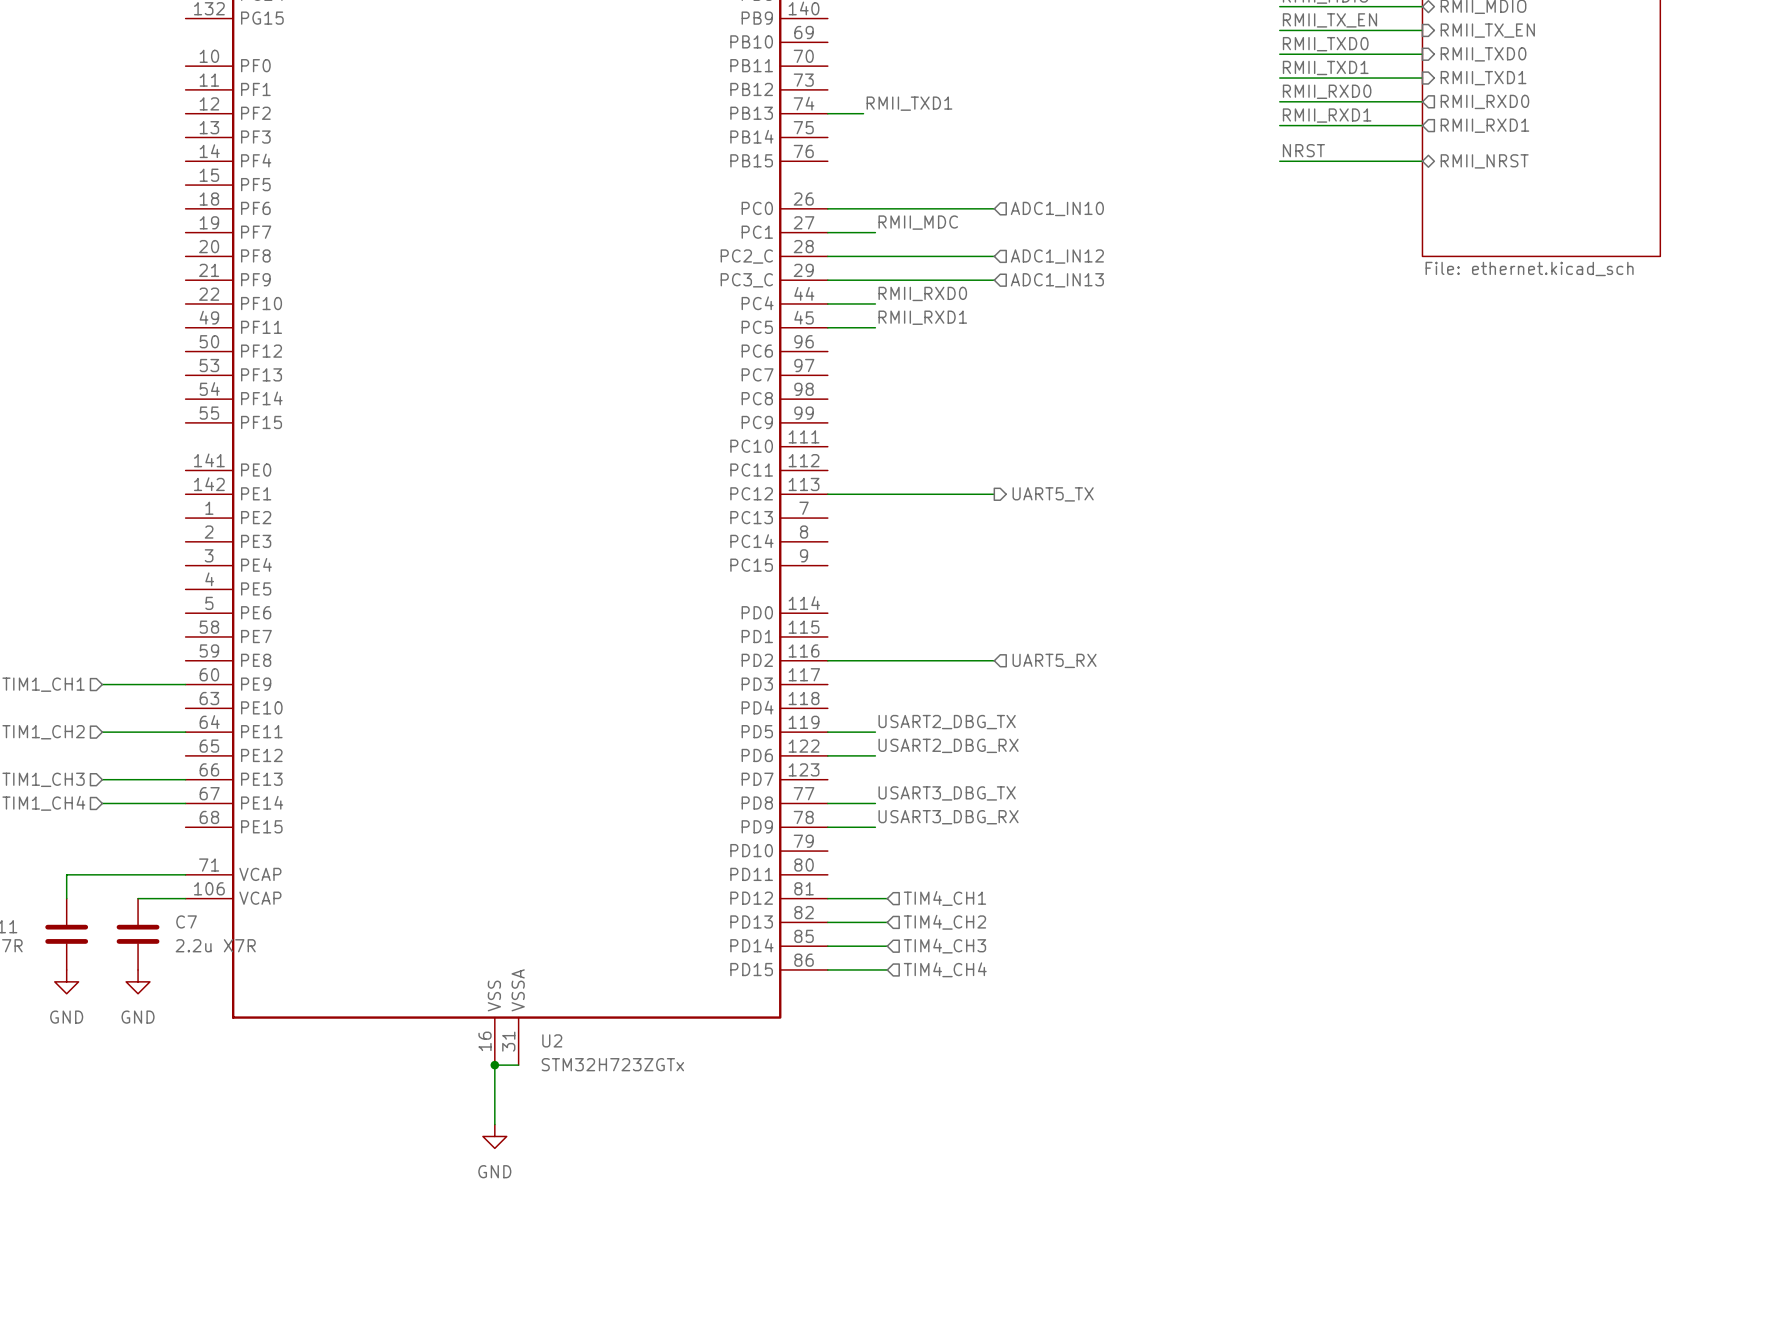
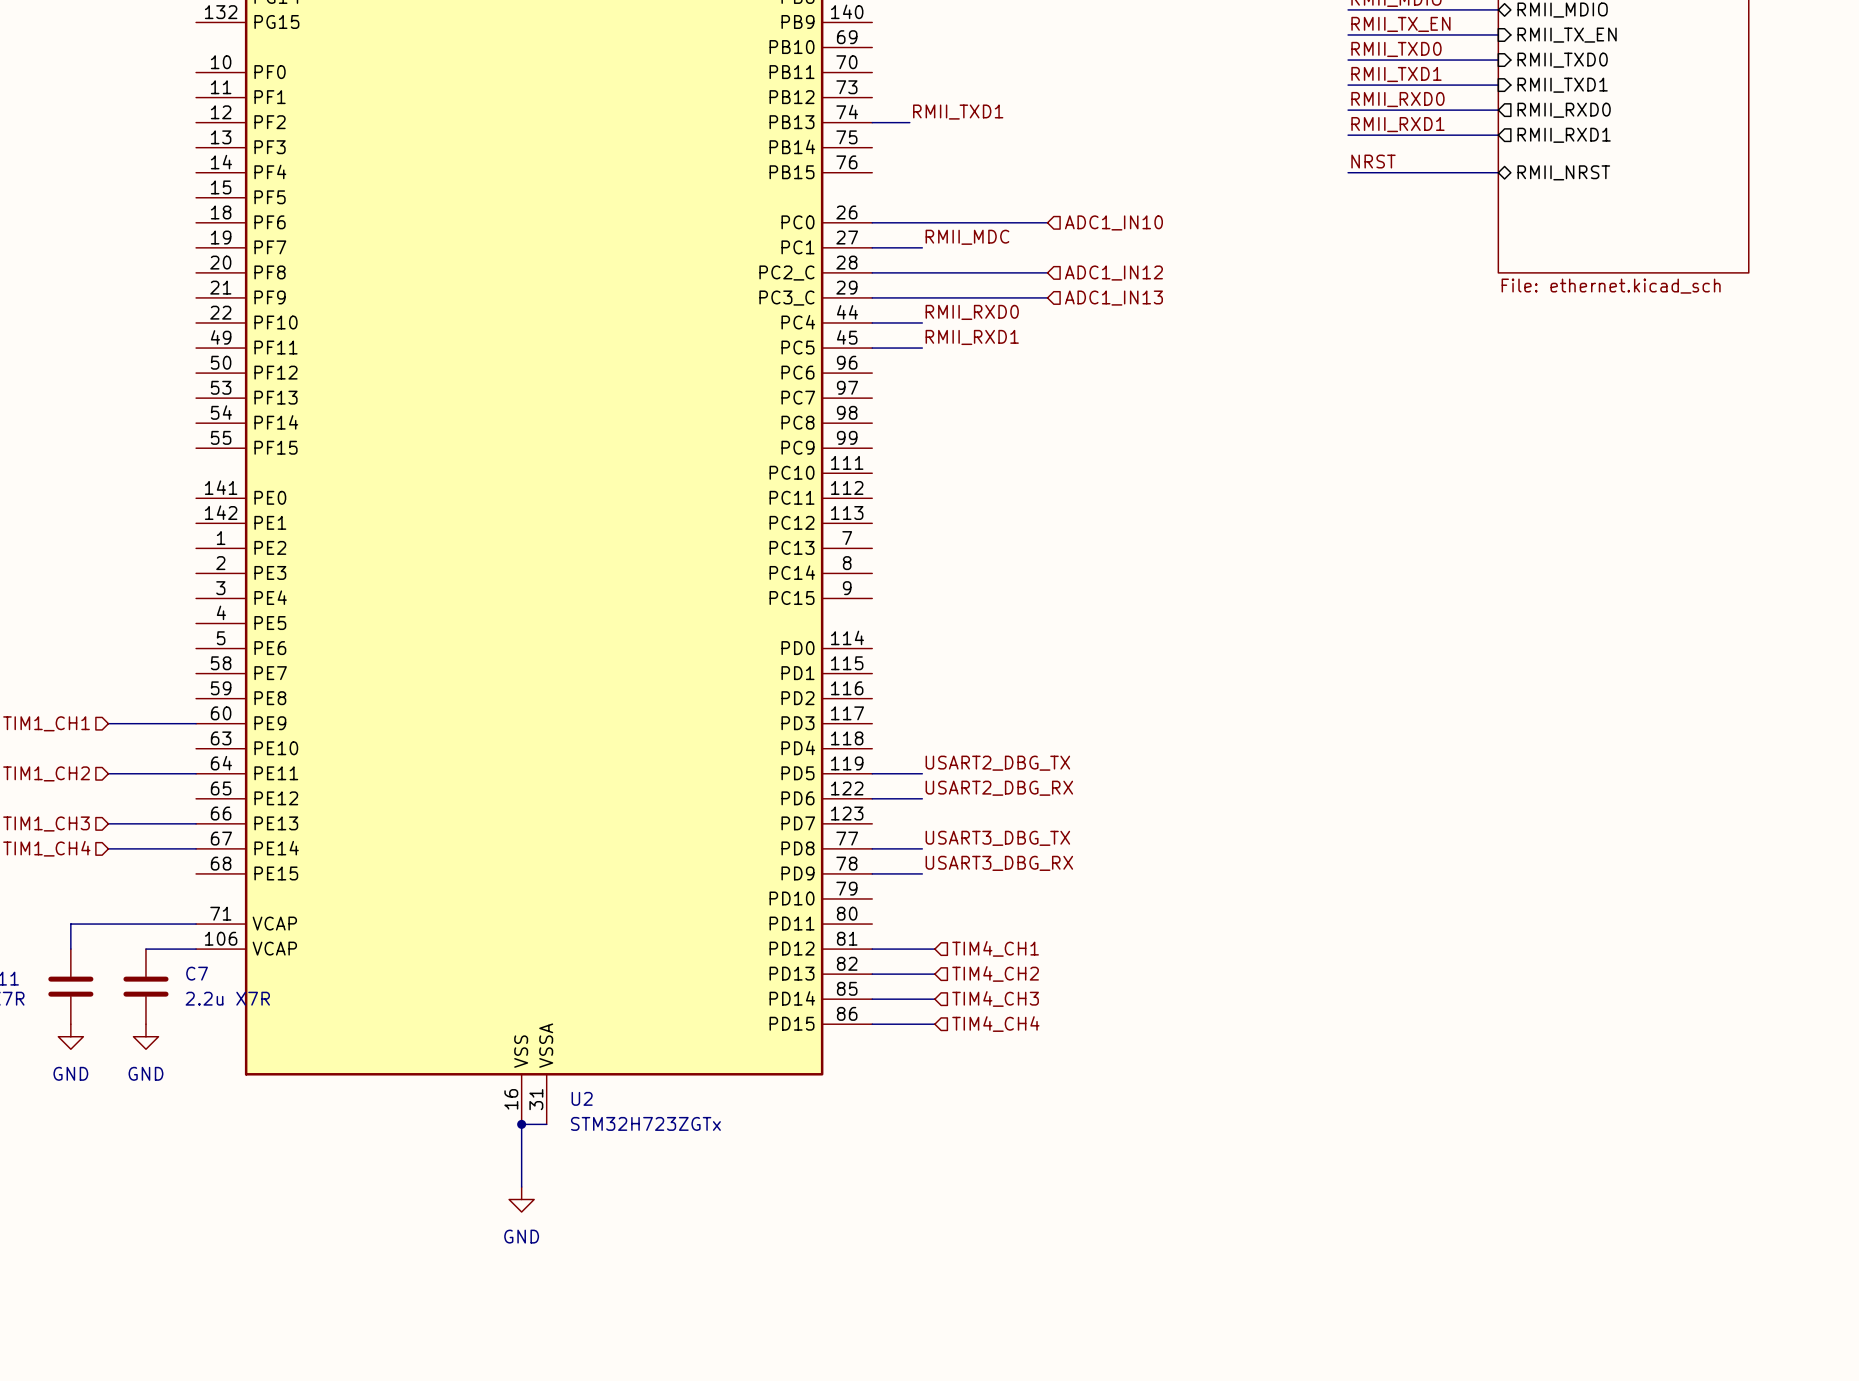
wire: (827, 494) (994, 494) -> none
hierarchical label: UART5_TX (1053, 494) -> none
wire: (827, 660) (994, 660) -> none
hierarchical label: UART5_RX (1054, 660) -> none

